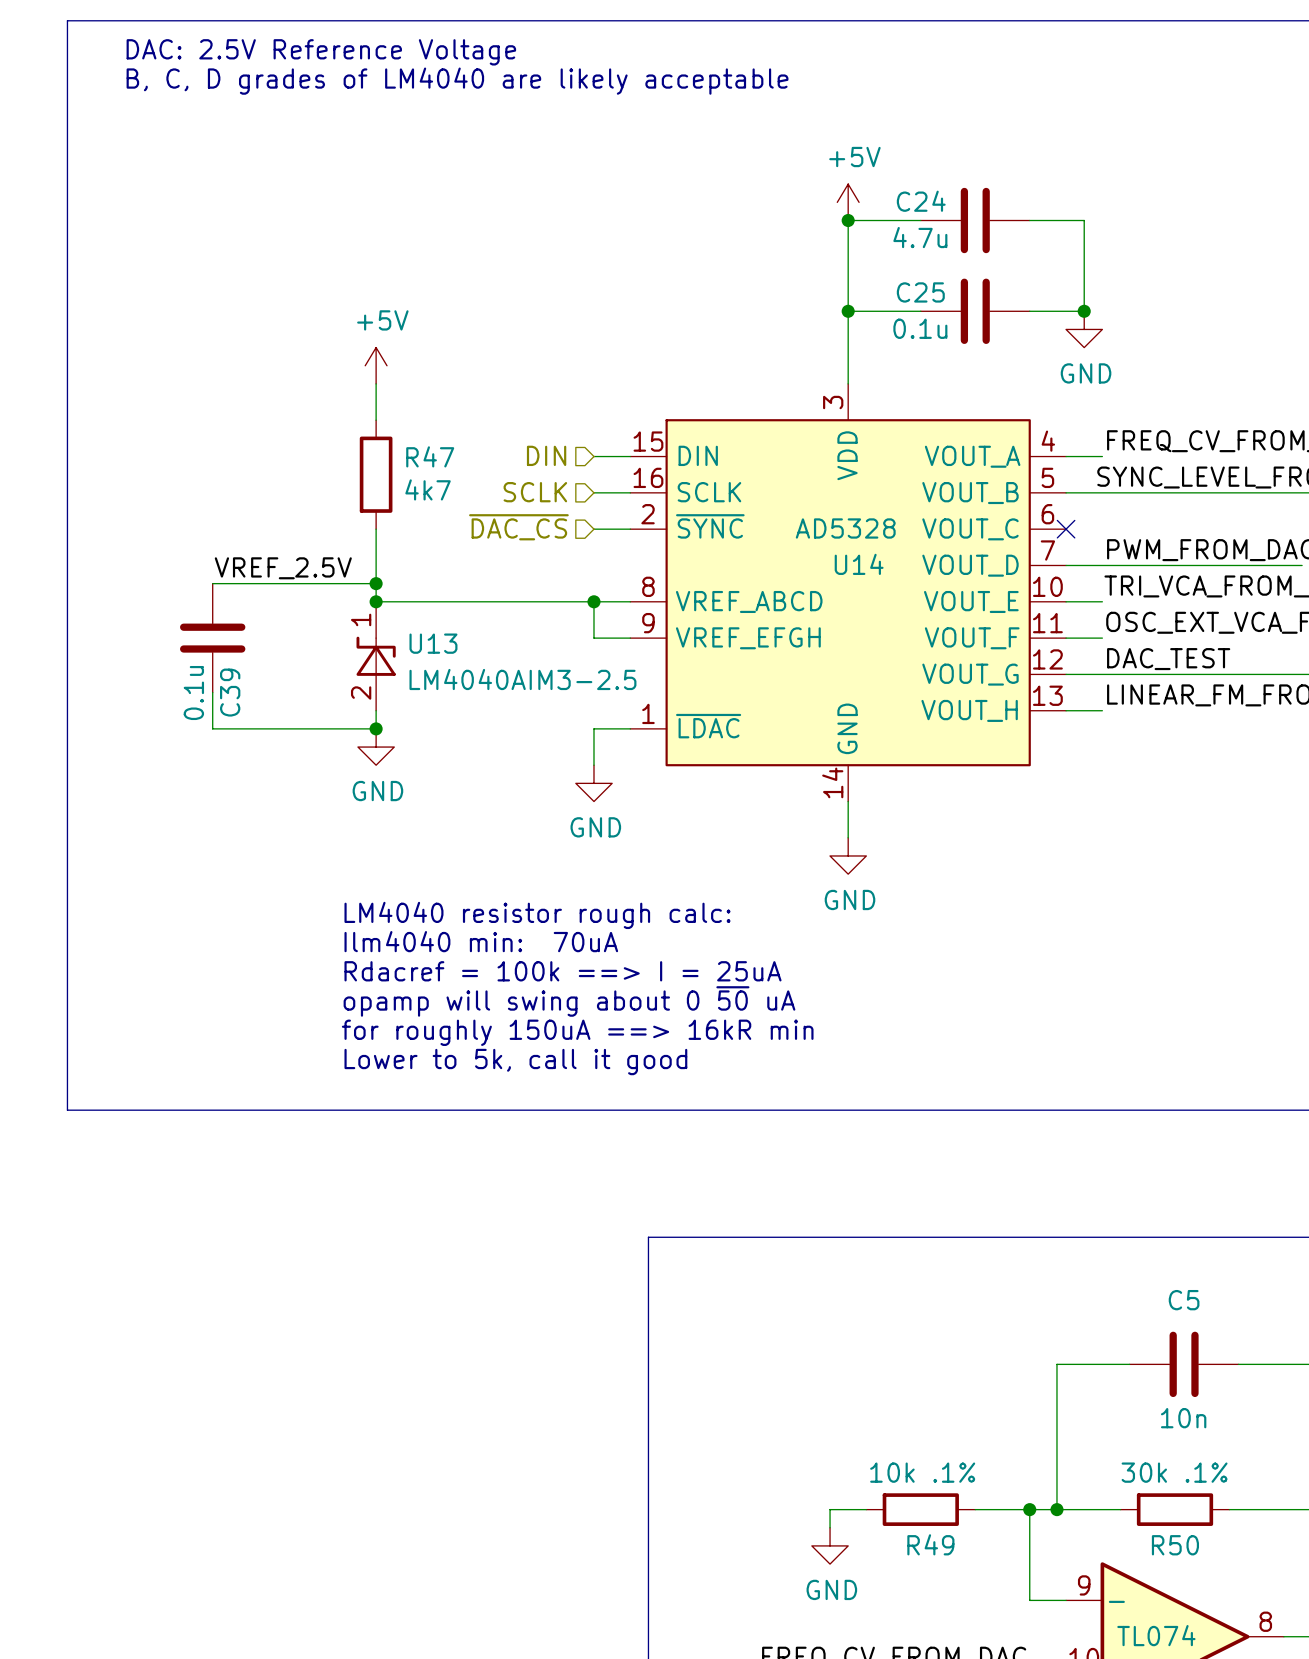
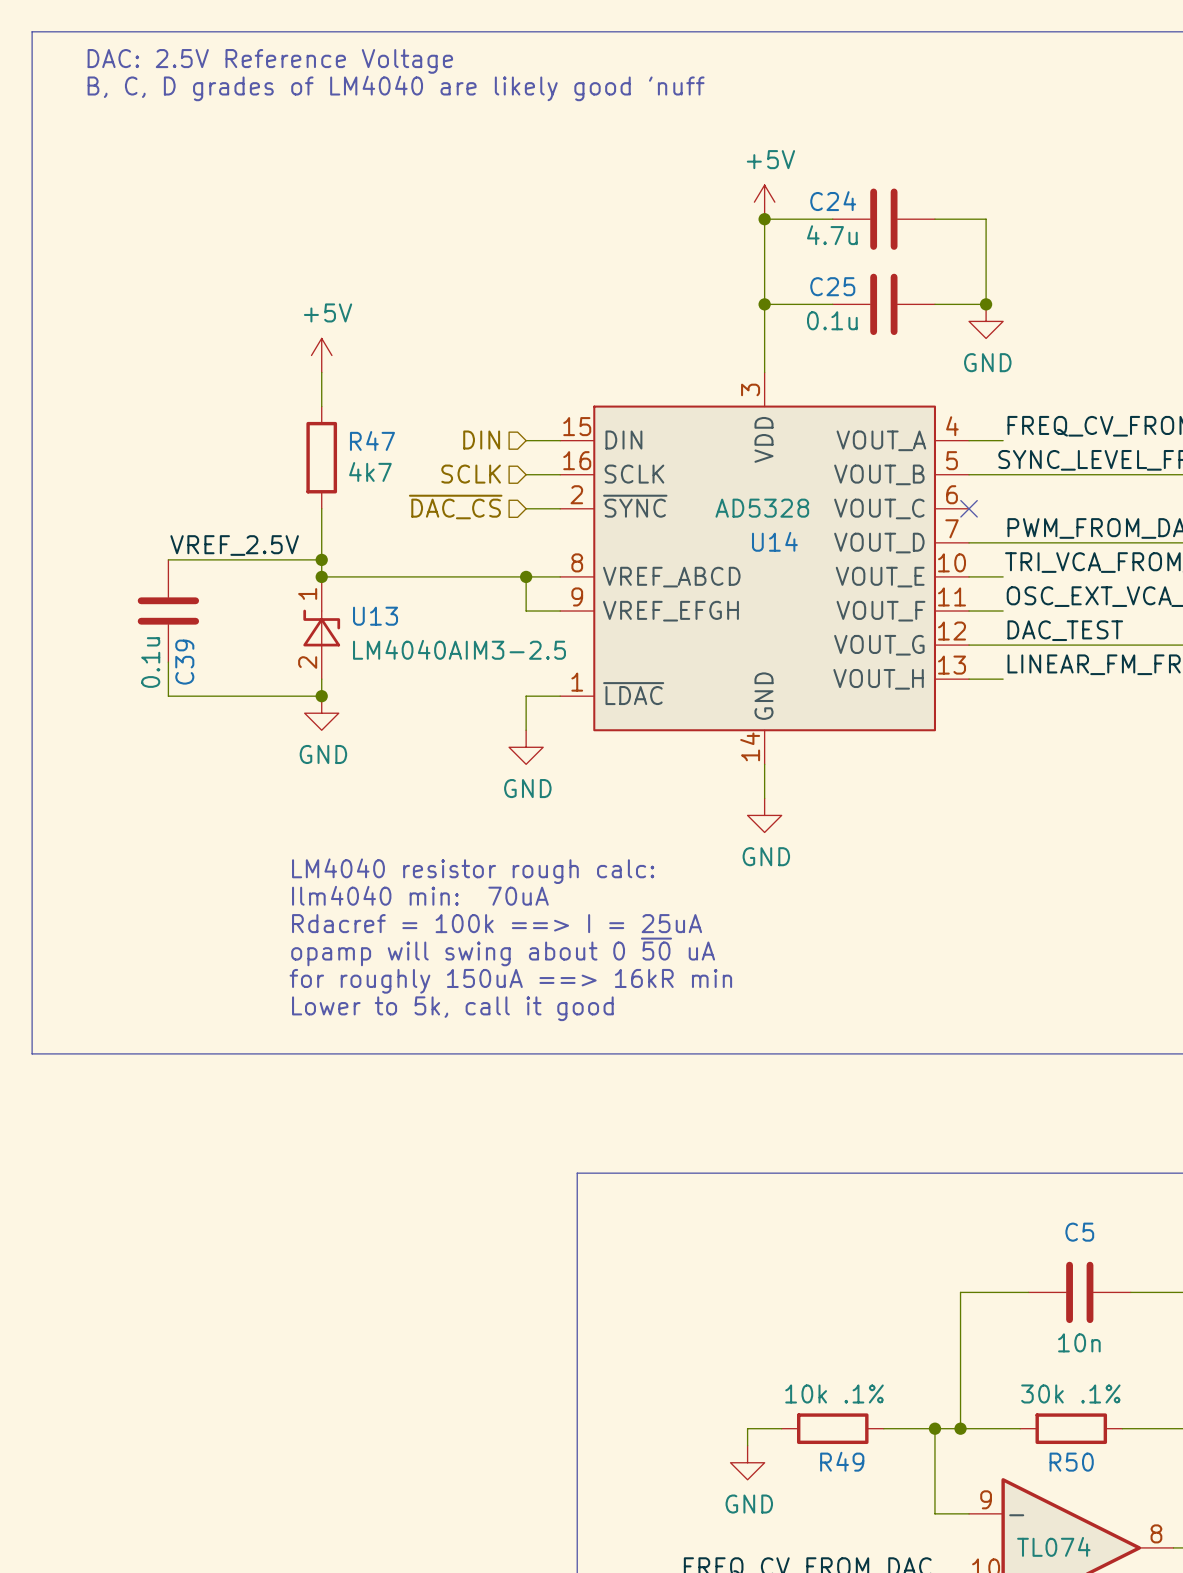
text: B, C, D grades of LM4040 are likely acceptable (457, 81) -> B, C, D grades of LM4040 are likely good 'nuff (396, 88)

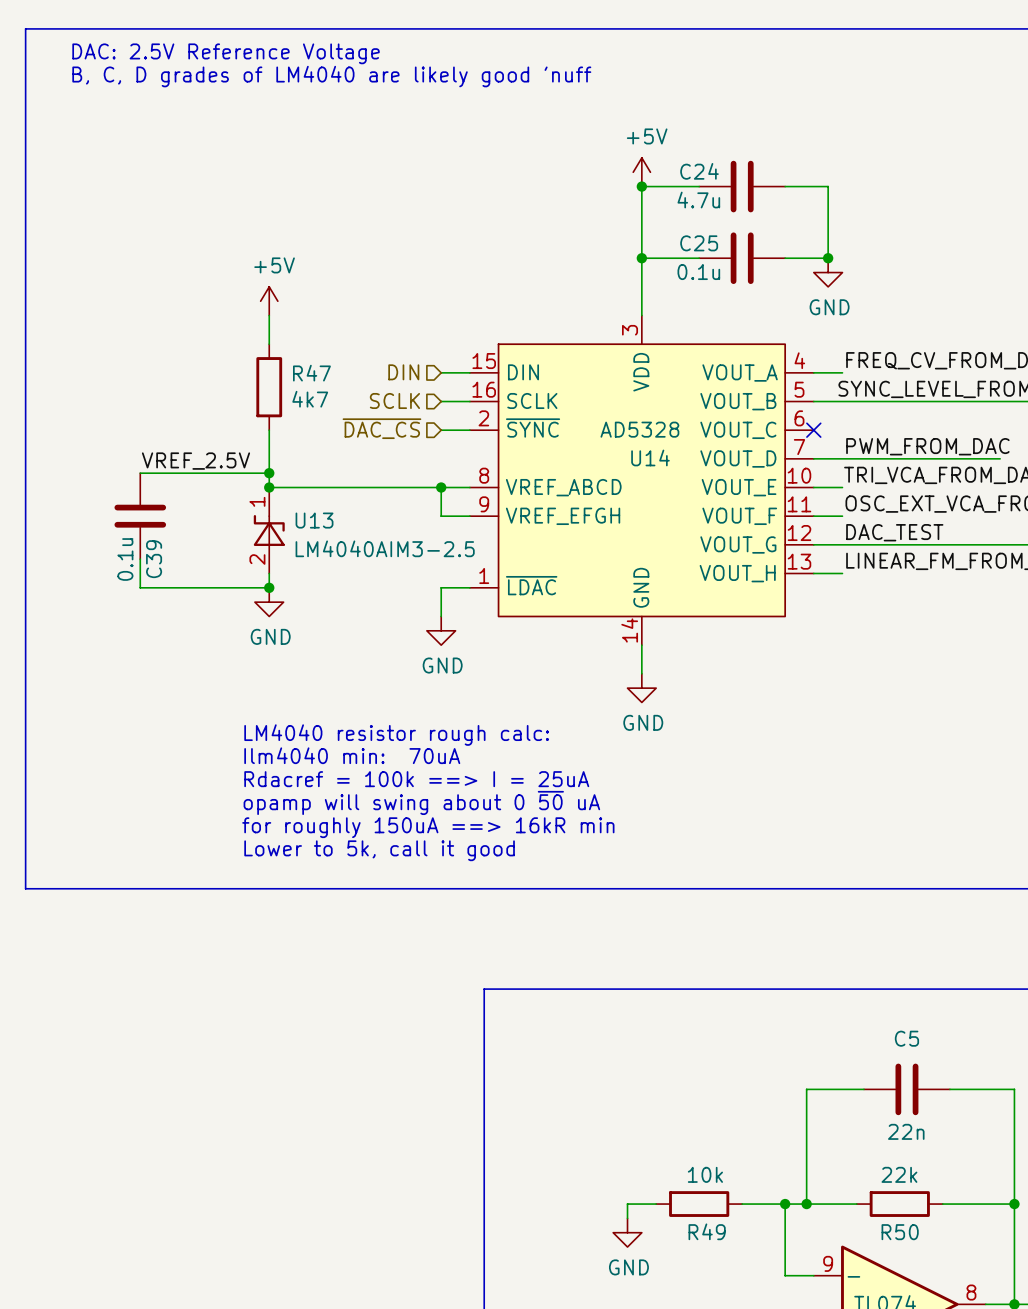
C5 value: 10n (1079, 1342) -> 22n (906, 1131)
R49 value: 10k .1% (834, 1393) -> 10k (705, 1174)
R50 value: 30k .1% (1070, 1393) -> 22k (899, 1174)

